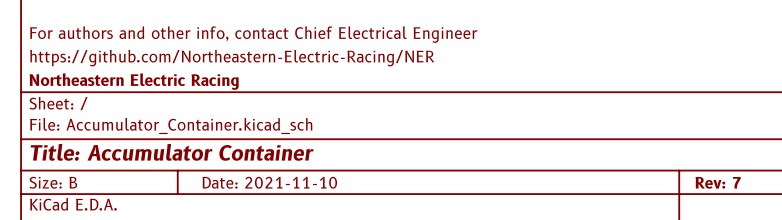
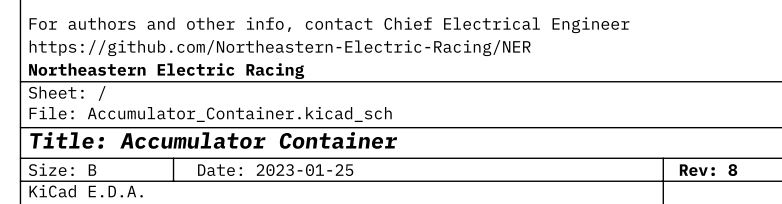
title block: Date: 2021-11-10 (269, 182) -> Date: 2023-01-25 (275, 170)
title block: Rev: 7 (718, 182) -> Rev: 8 (708, 170)

